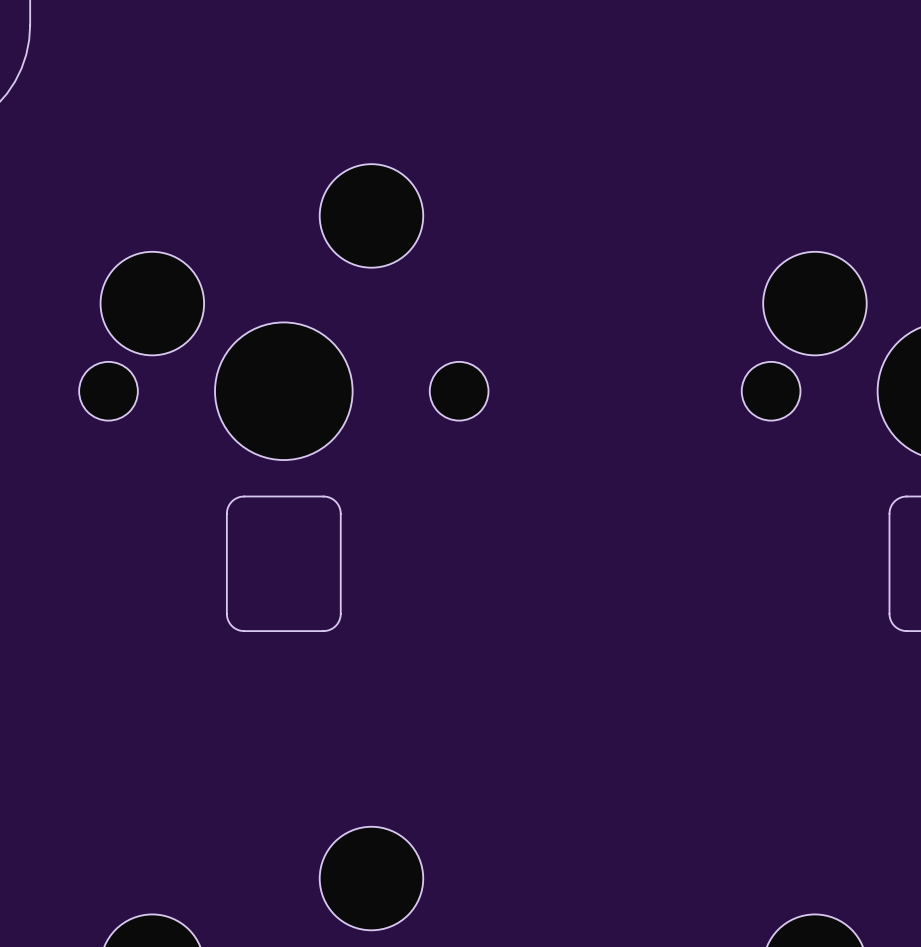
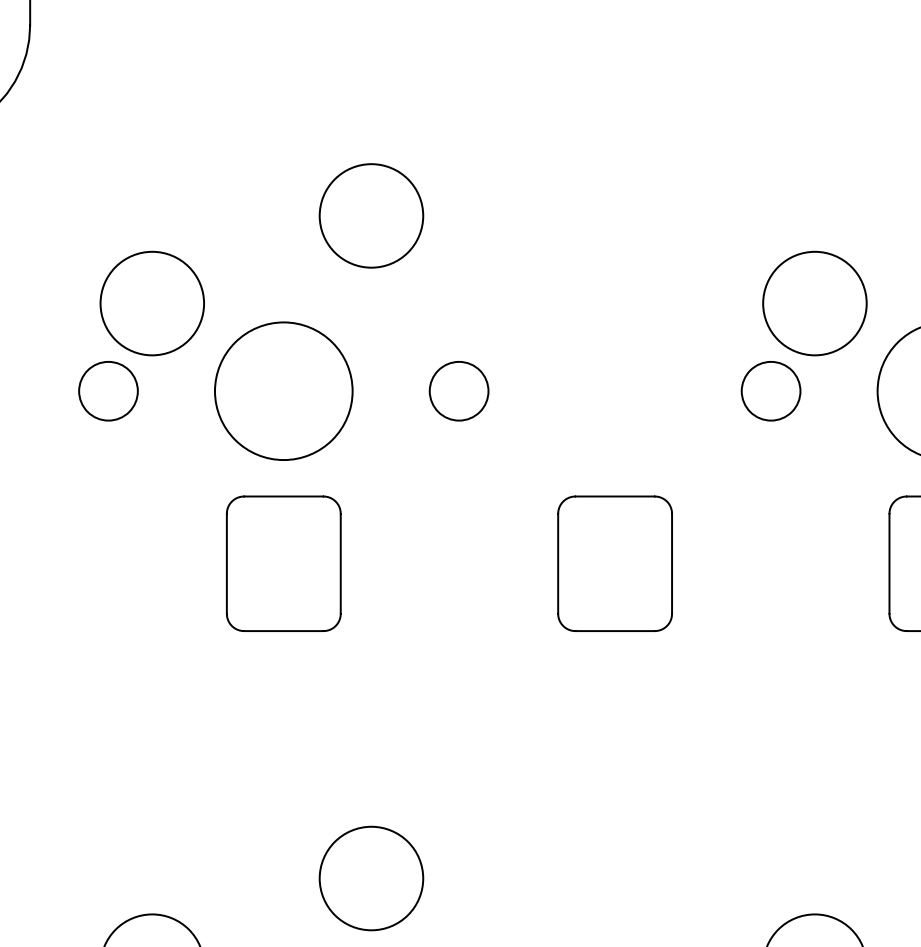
part: none -> (615, 563)

